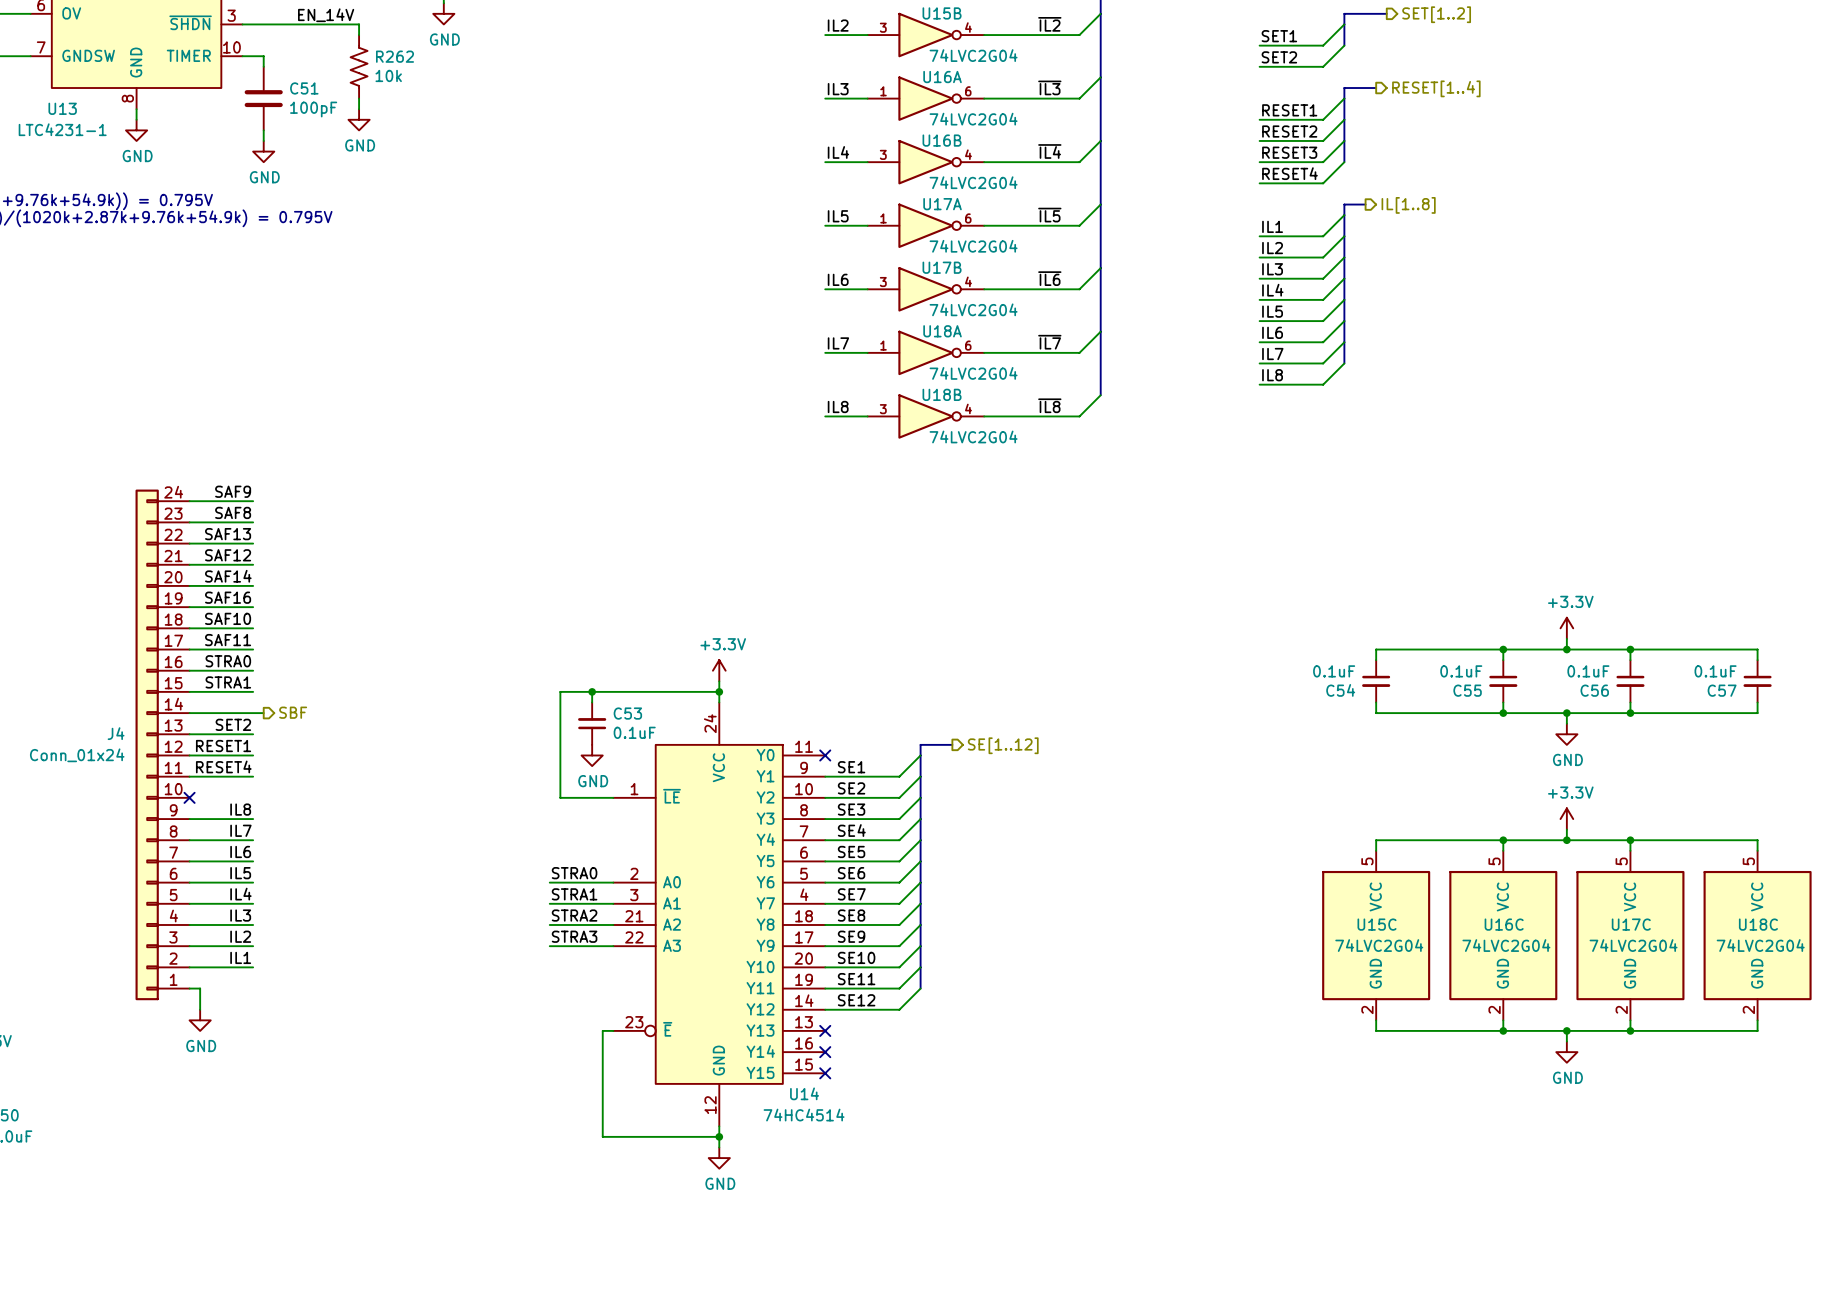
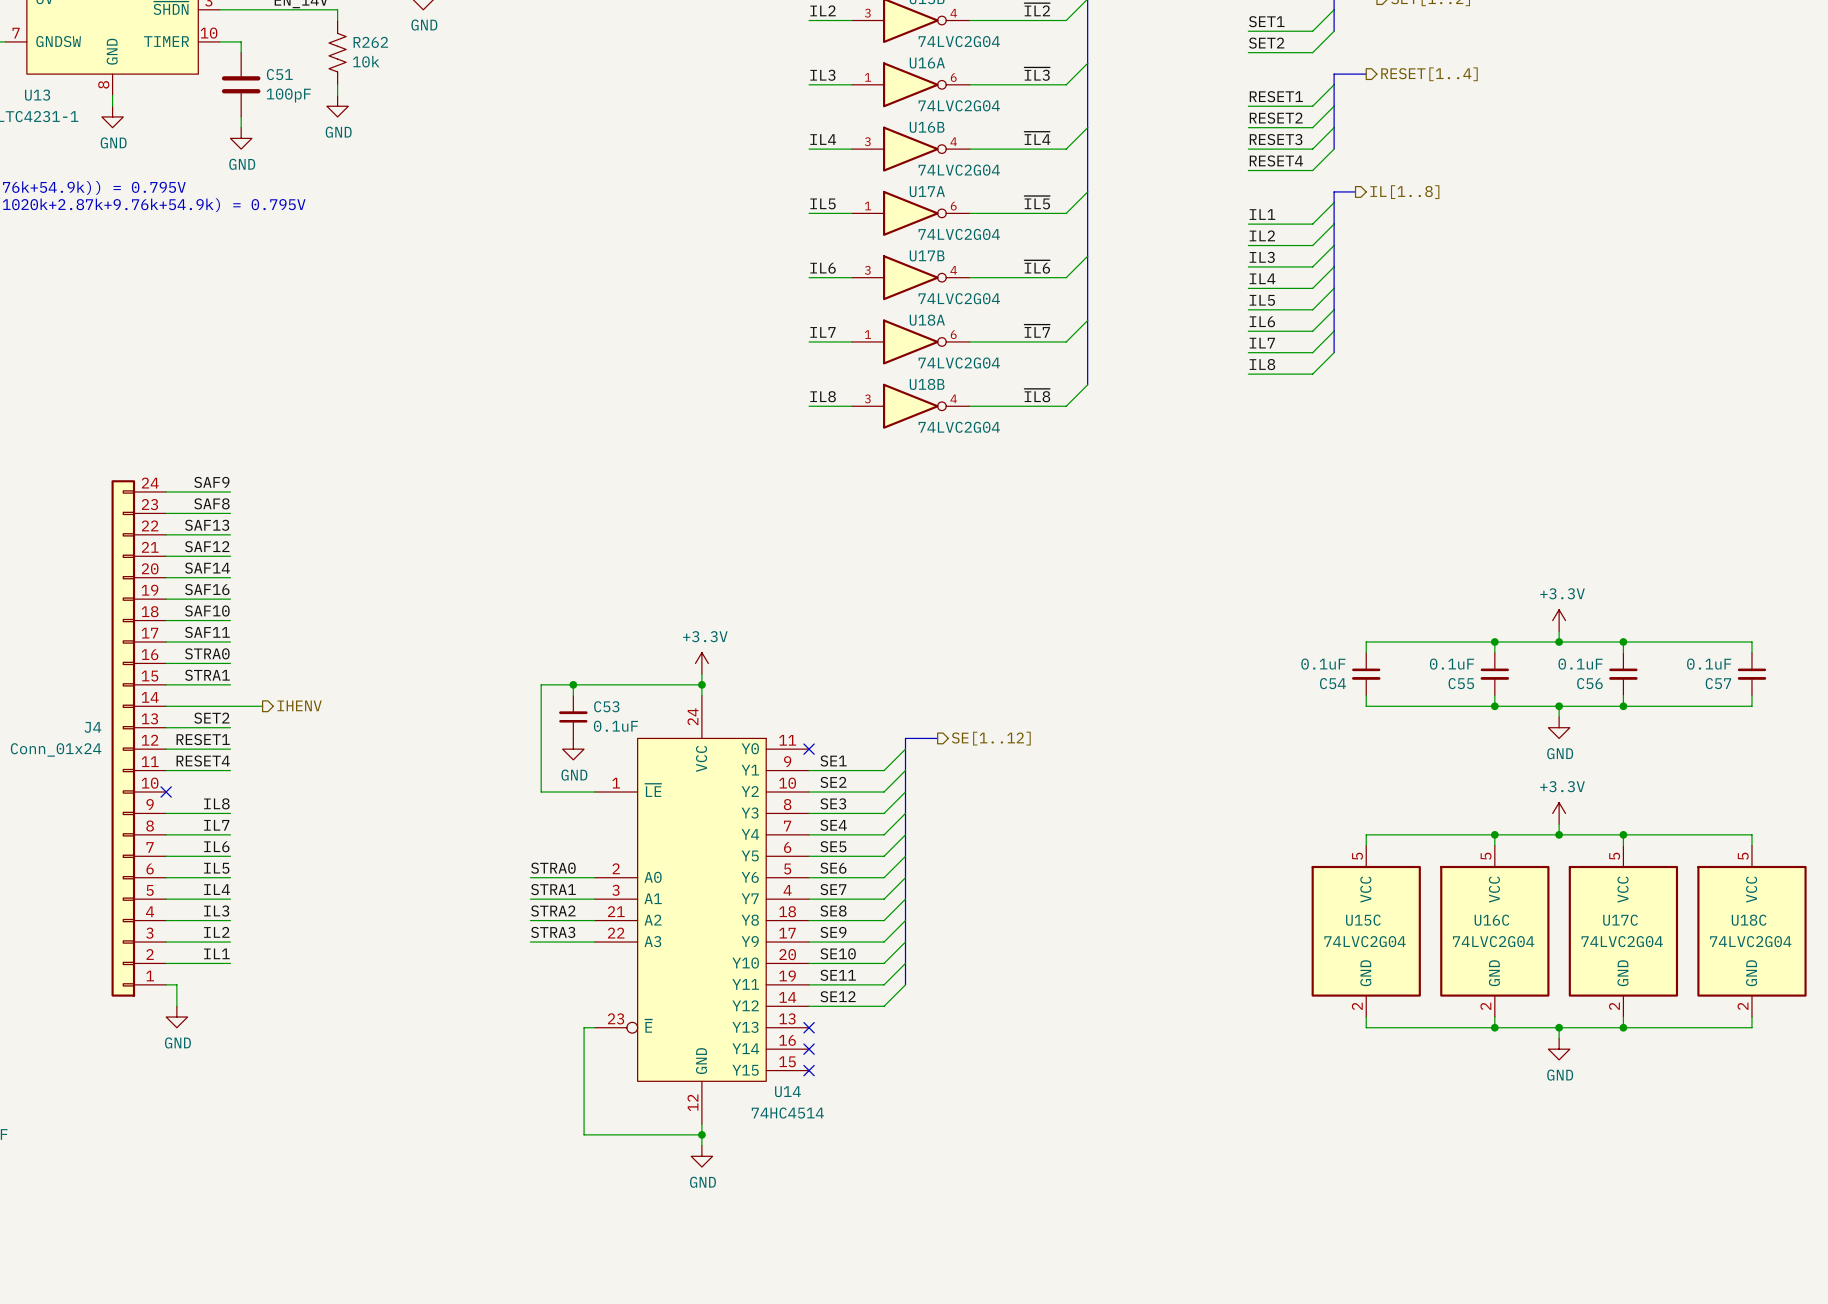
hierarchical label: SBF (293, 712) -> none
hierarchical label: none -> IHENV (299, 705)
wire: none -> (241, 706) (262, 706)

